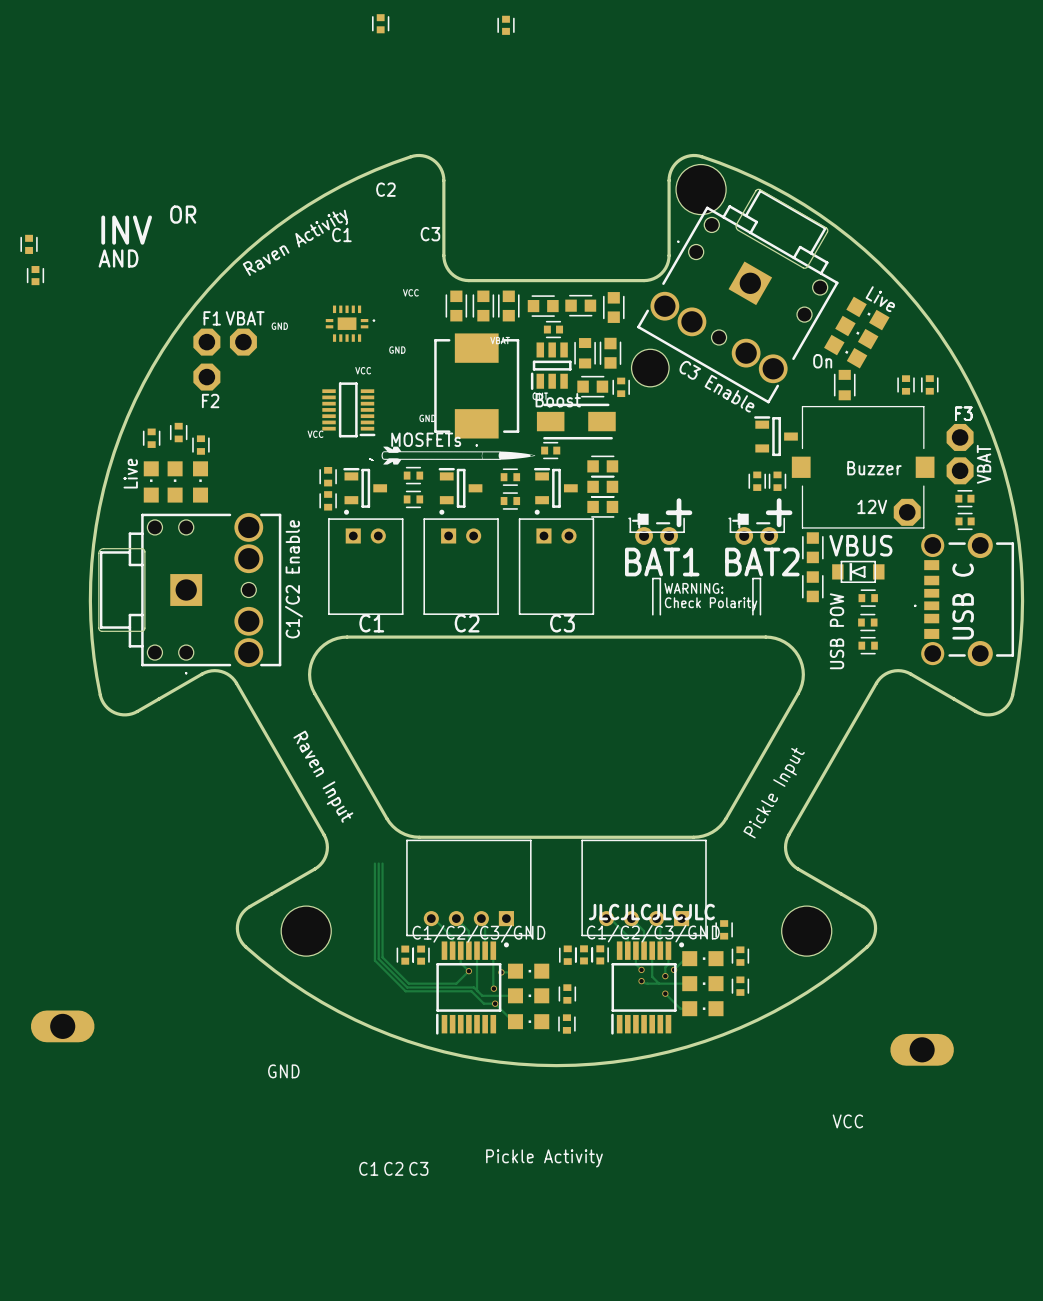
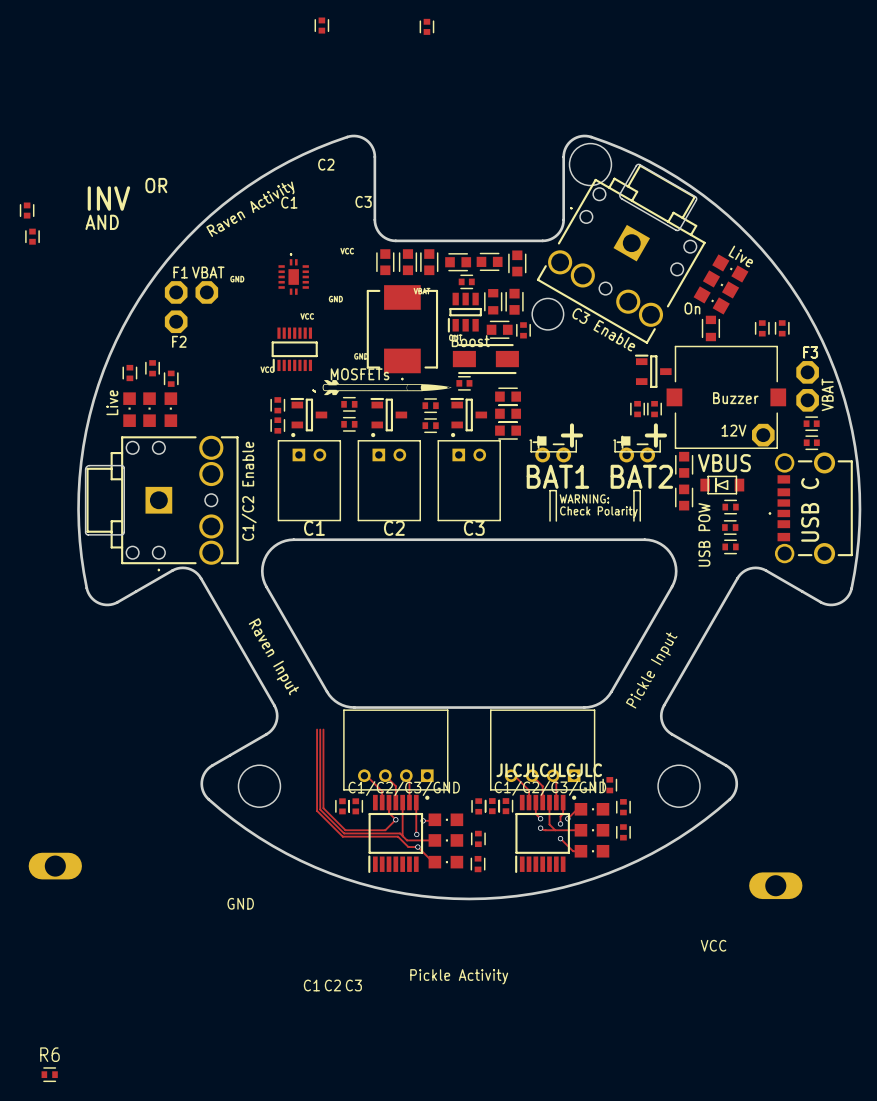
part rotation: 0° (350, 323) -> 90° counterclockwise (293, 274)
part rotation: 0° (348, 409) -> 90° clockwise (294, 349)
R6: none -> (49, 1074)

